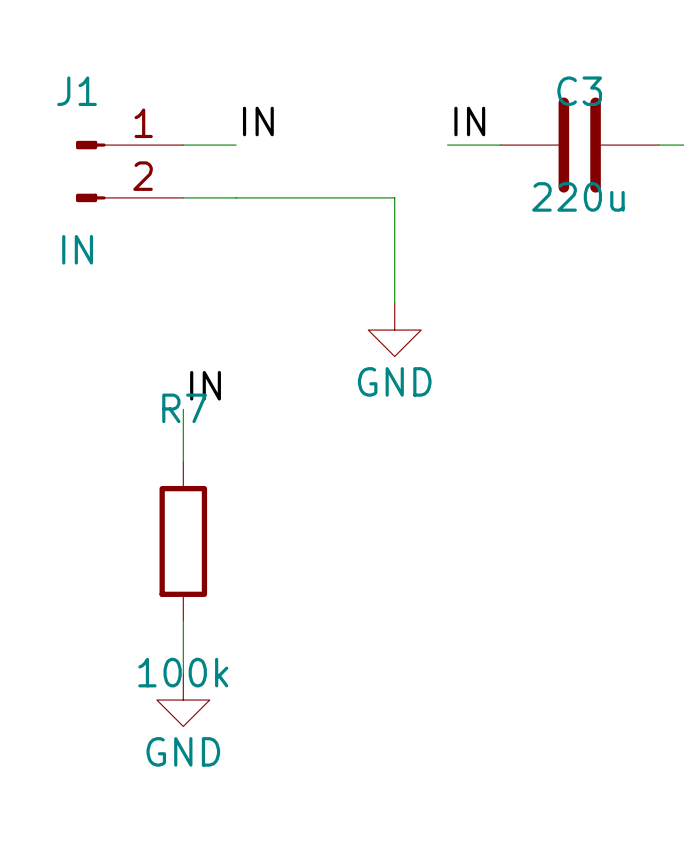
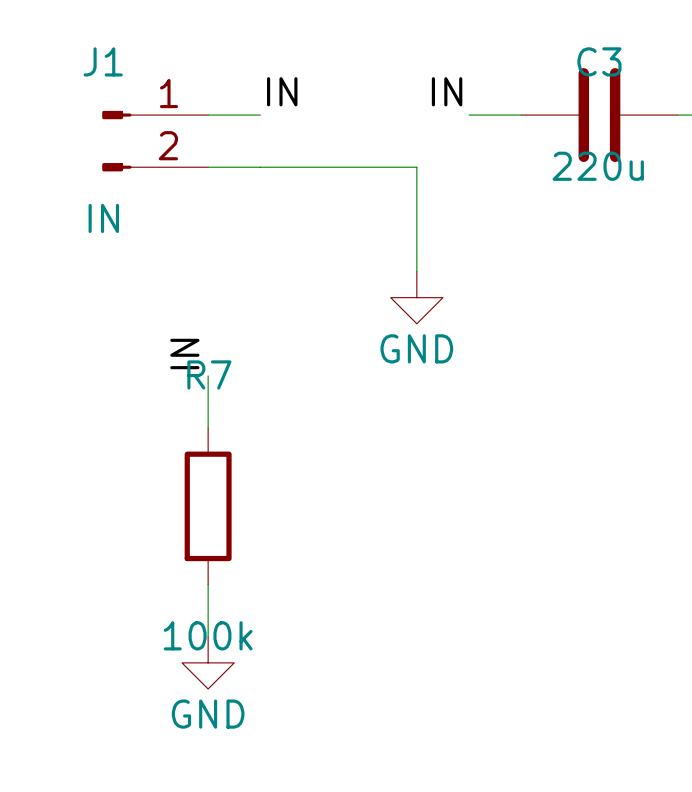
label position: IN (469, 121) -> IN (447, 91)
label rotation: 0° (205, 385) -> 90° counterclockwise (184, 354)

